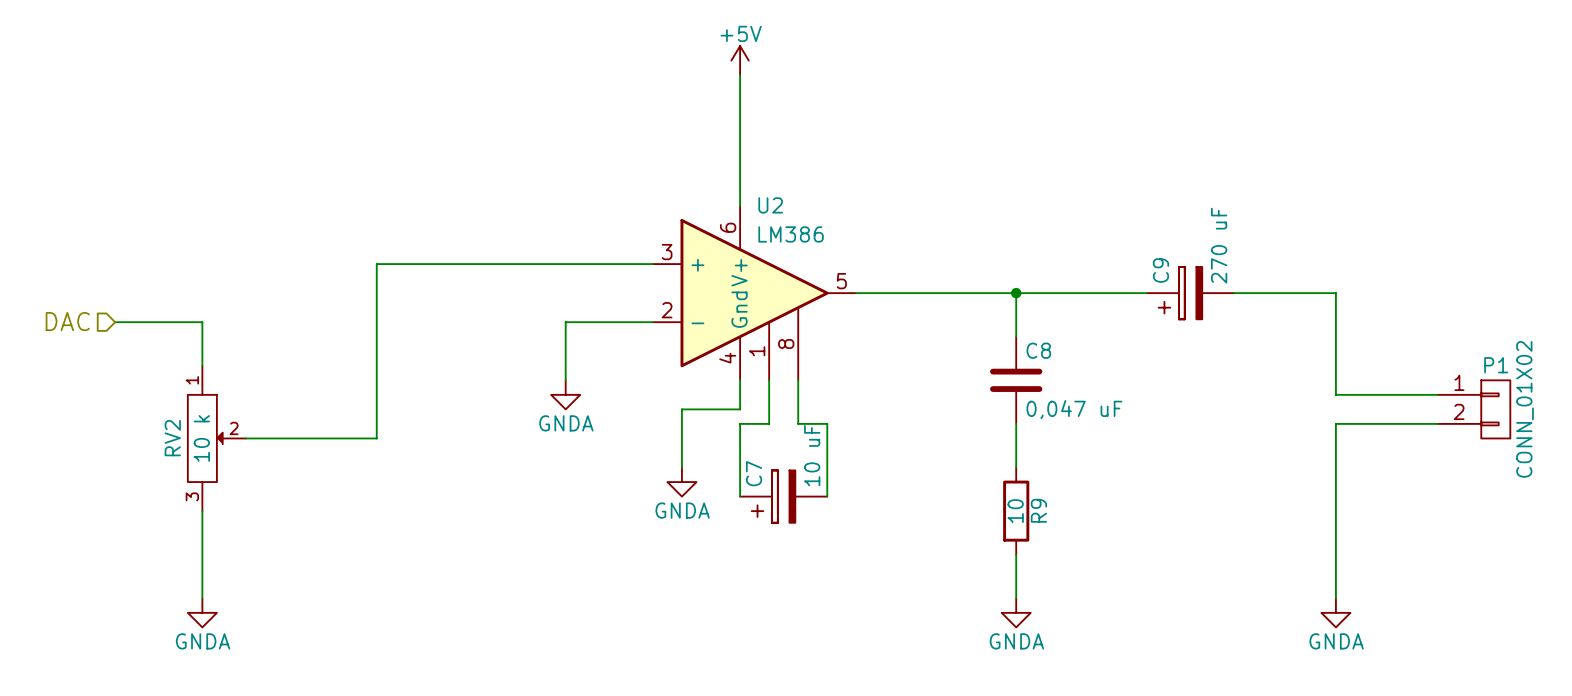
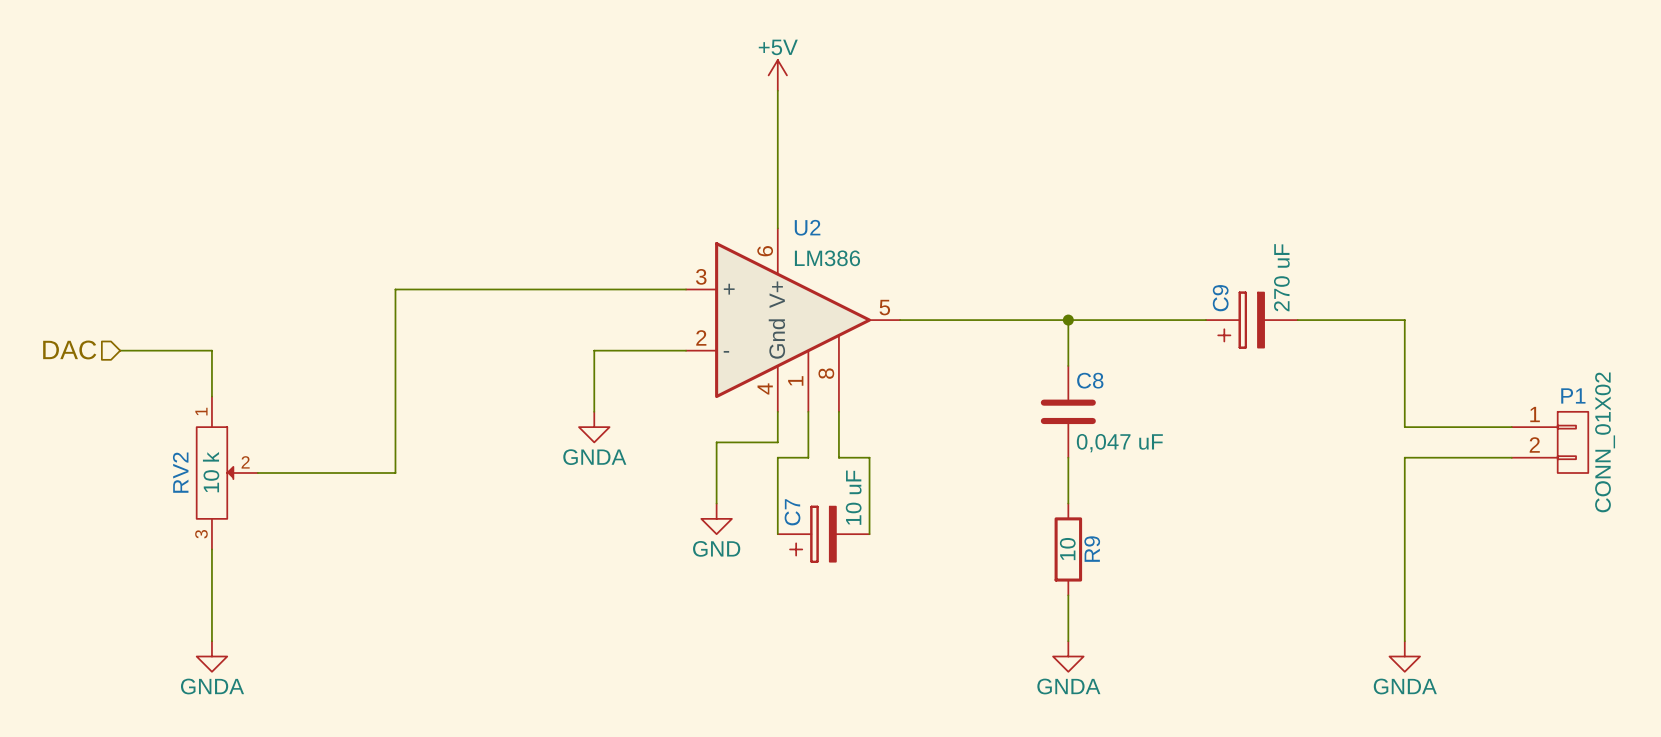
power symbol: GNDA (681, 482) -> GND (716, 518)

